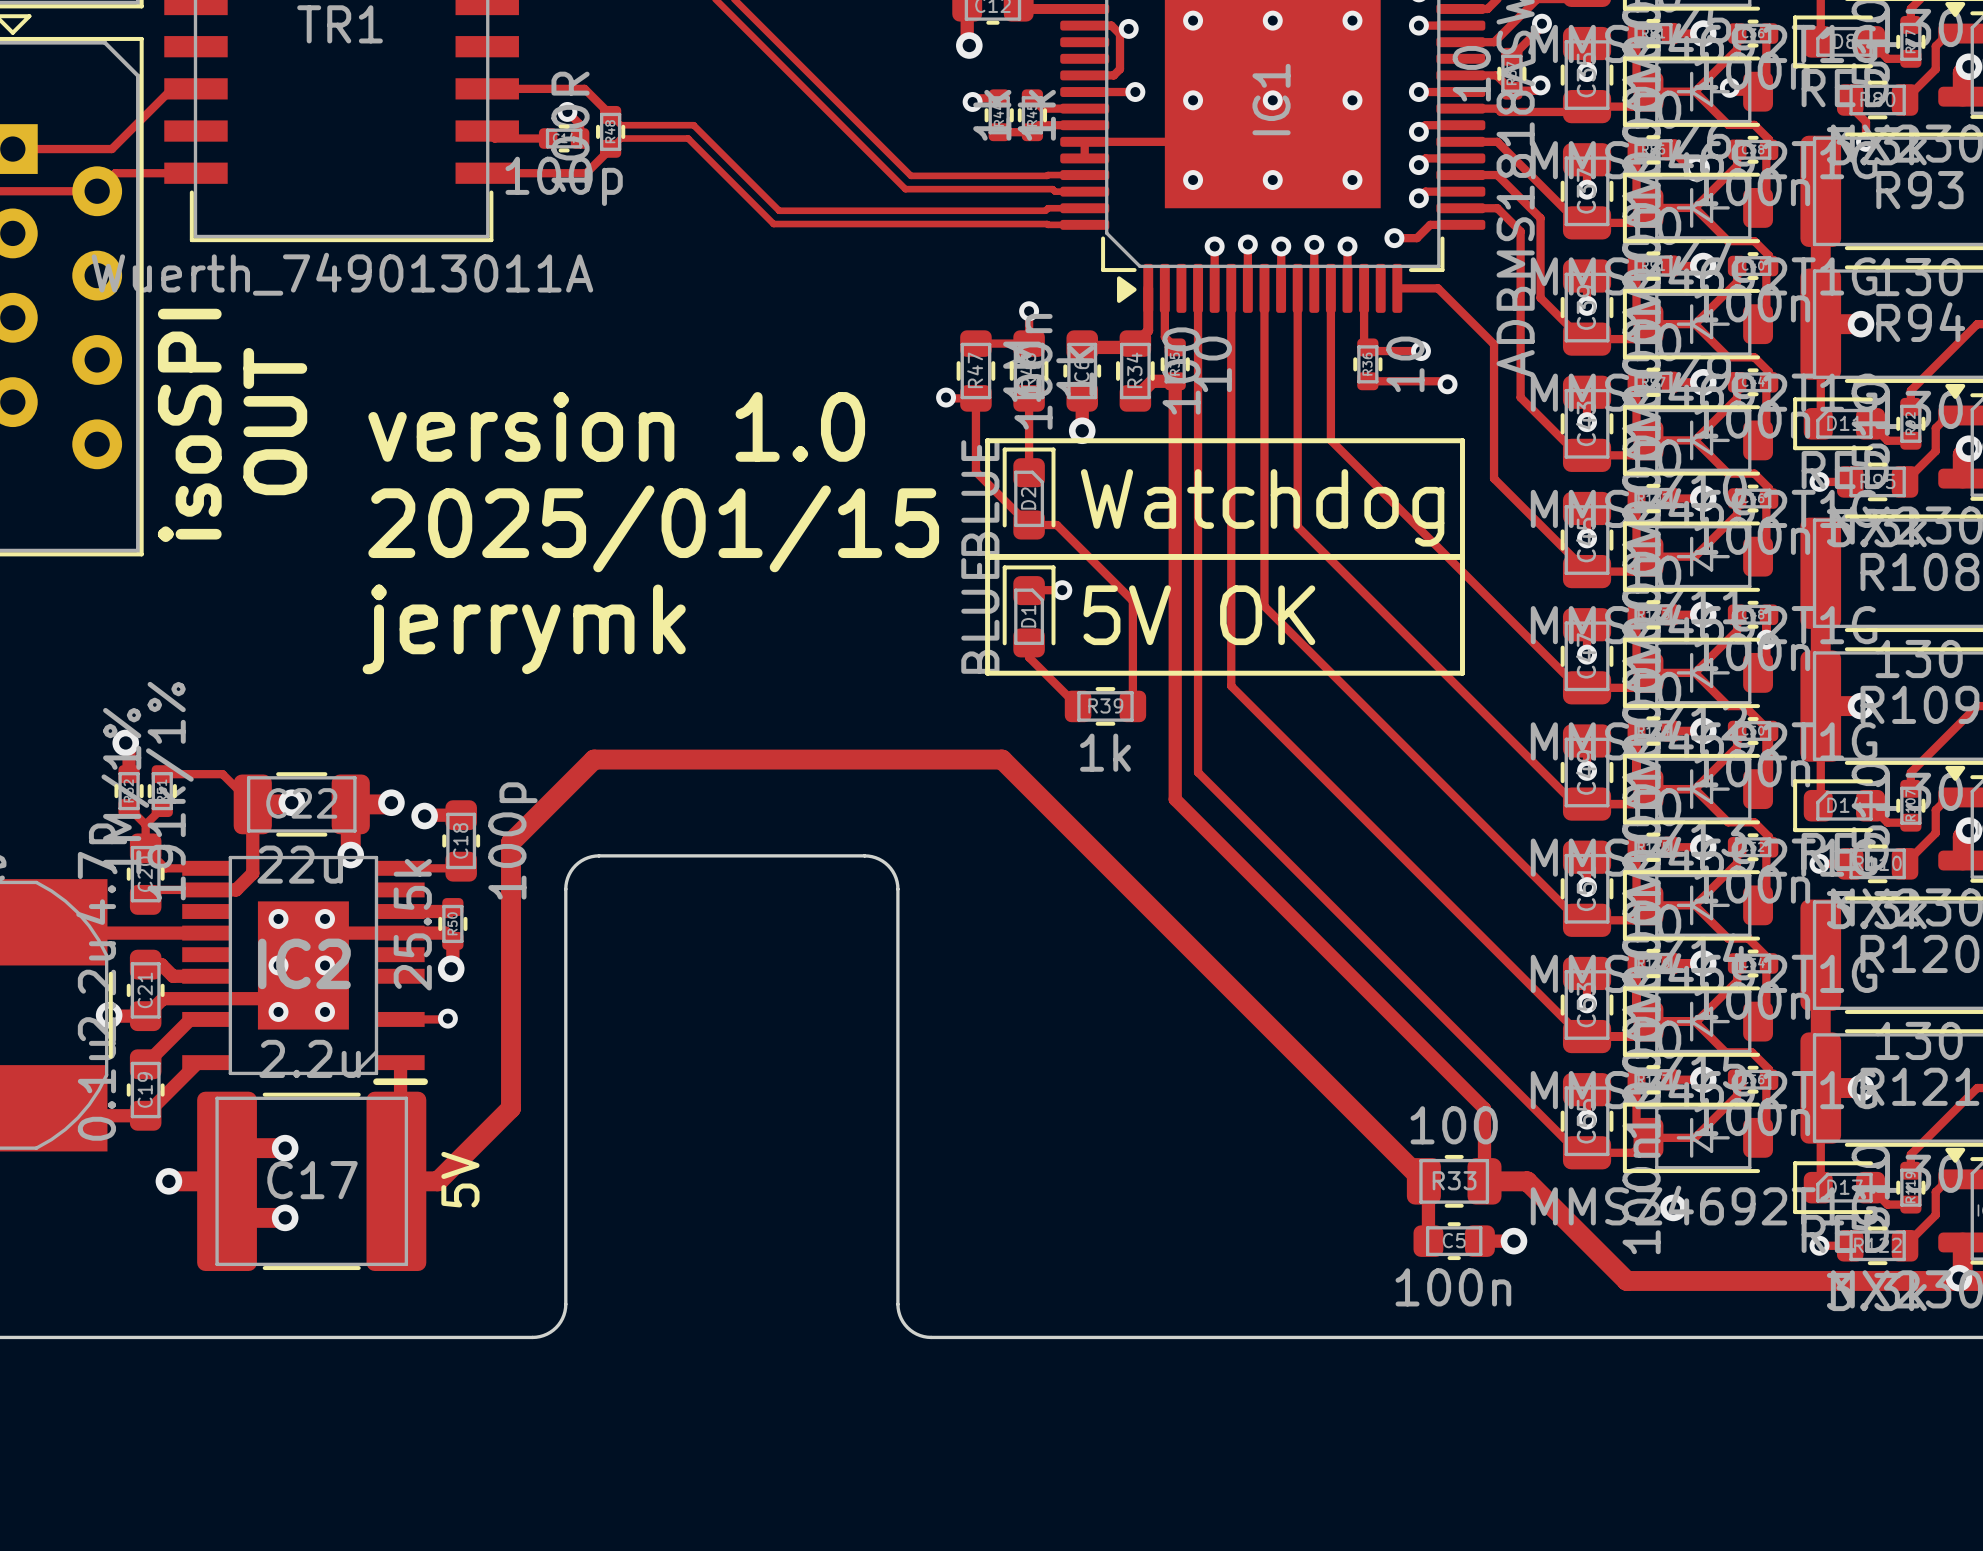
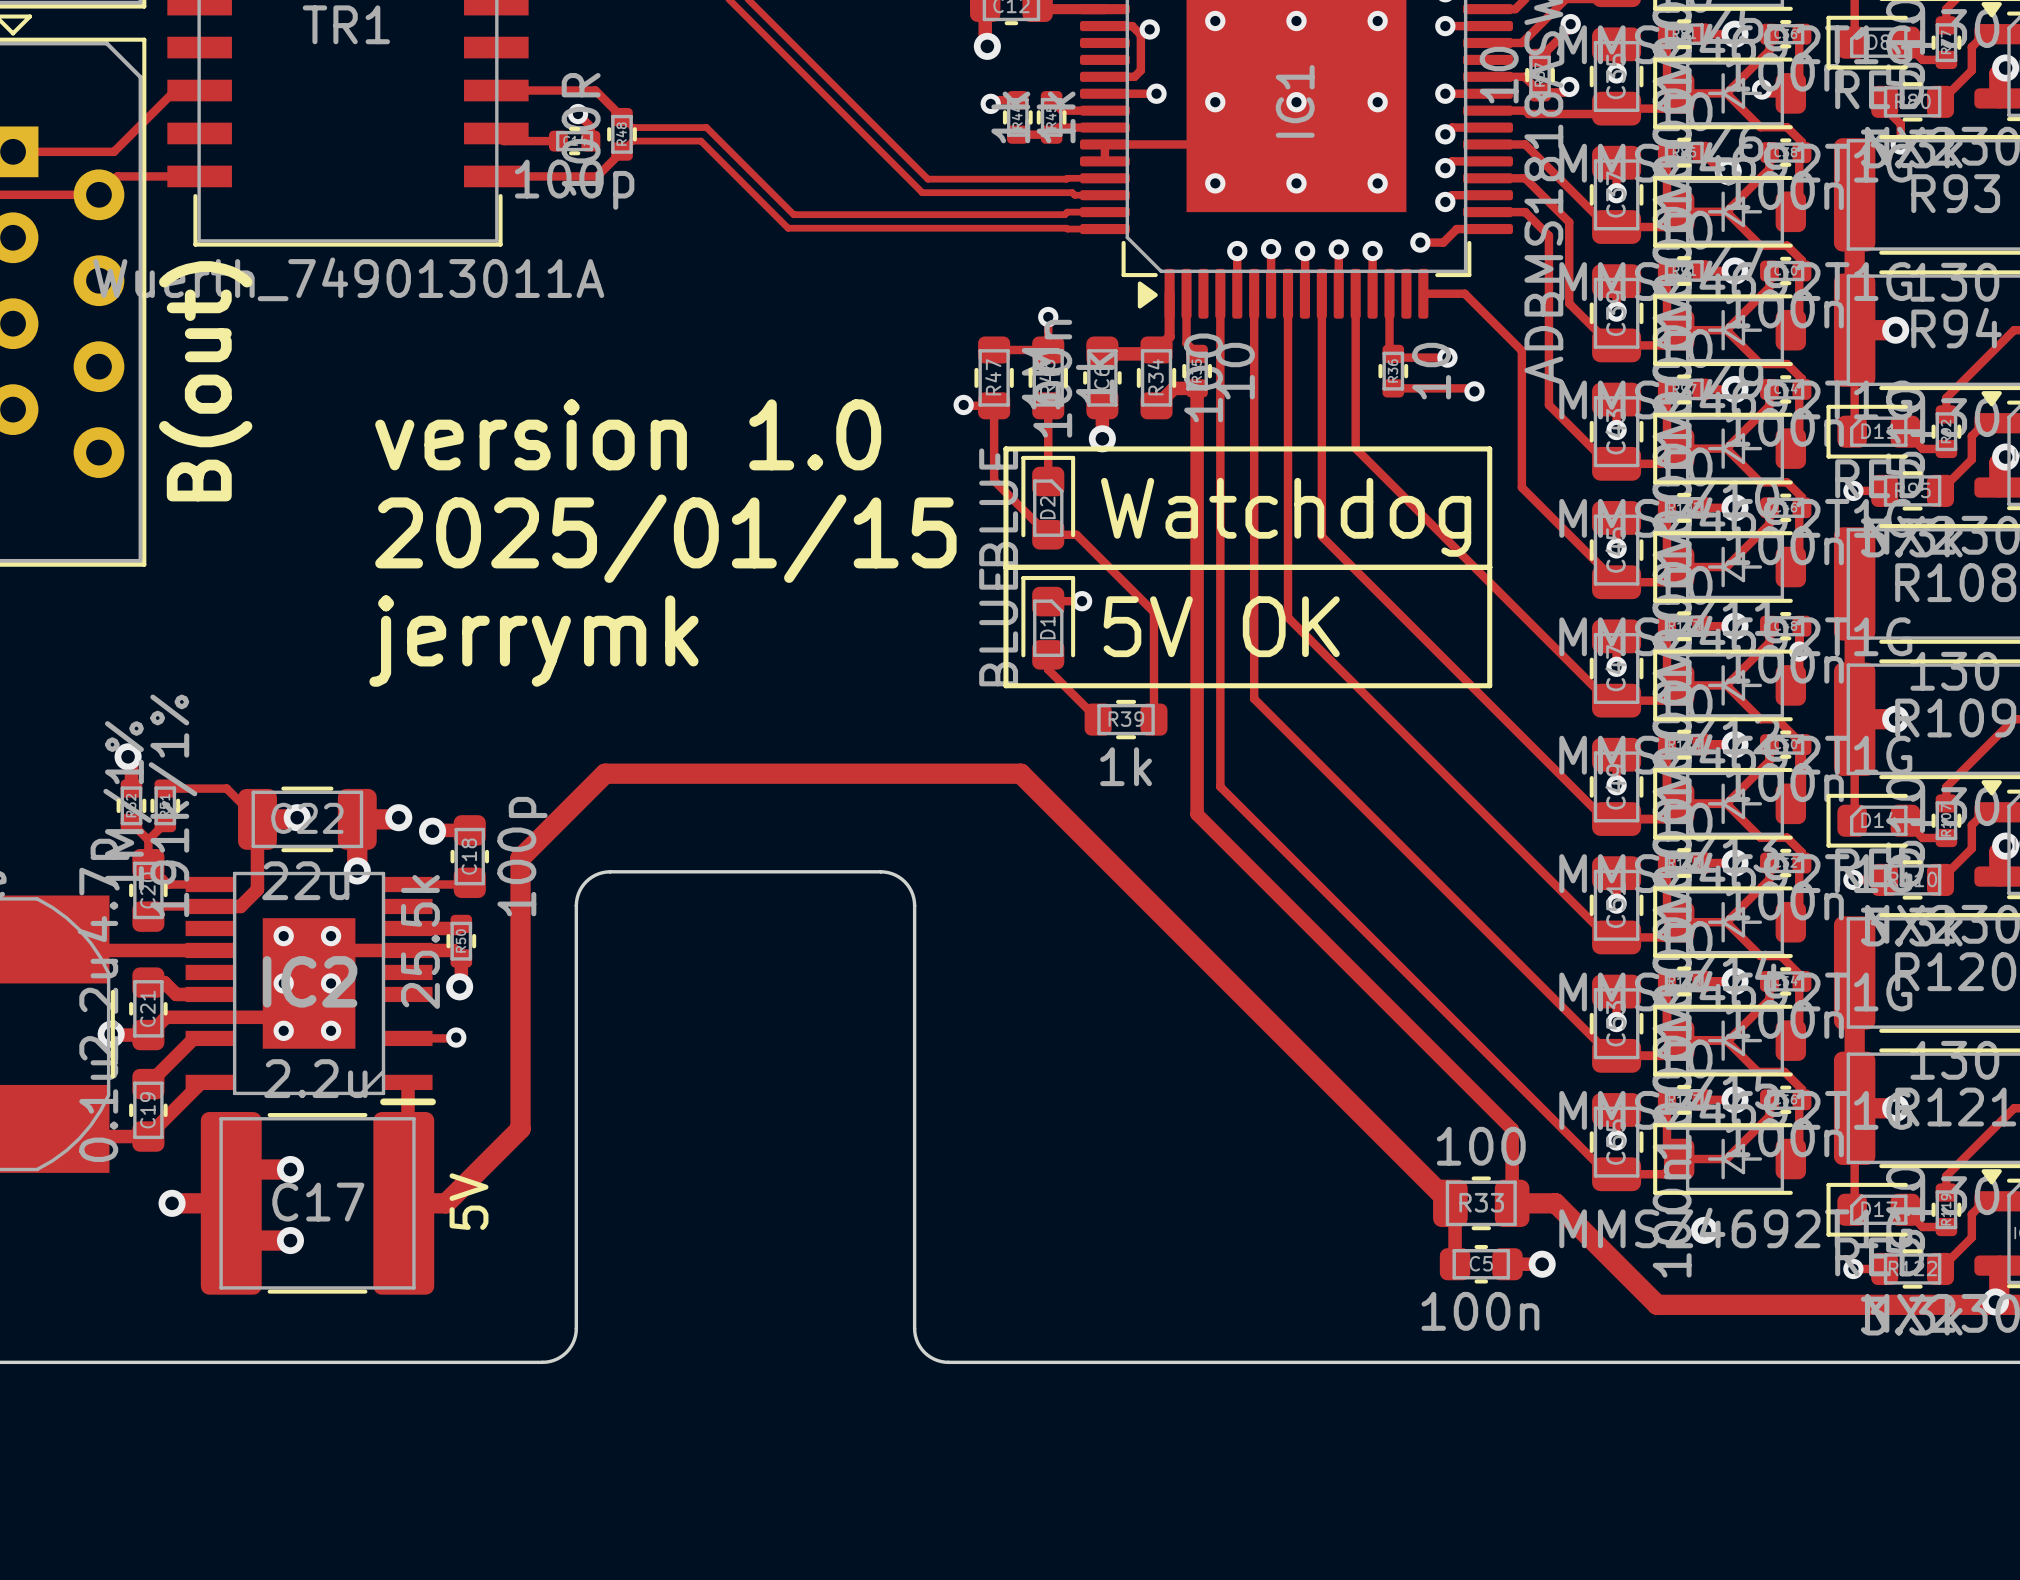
text: none -> B(out) (205, 381)
text: OUT (275, 421) -> none
text: isoSPI (189, 425) -> none

